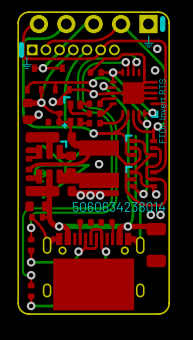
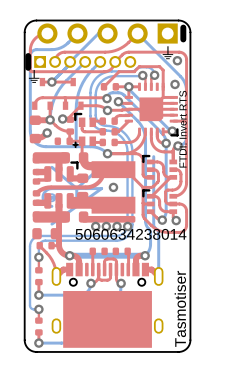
via: (80, 195) -> none
via: (90, 195) -> none
via: (100, 195) -> none
via: none -> (95, 226)
via: none -> (106, 226)
via: none -> (117, 226)
via: none -> (127, 226)
via: (150, 214) -> none
via: (160, 214) -> none
top track: (127, 226) (153, 226) (156, 229) -> none
part: (156, 245) -> none
text: none -> Tasmotiser (180, 308)

